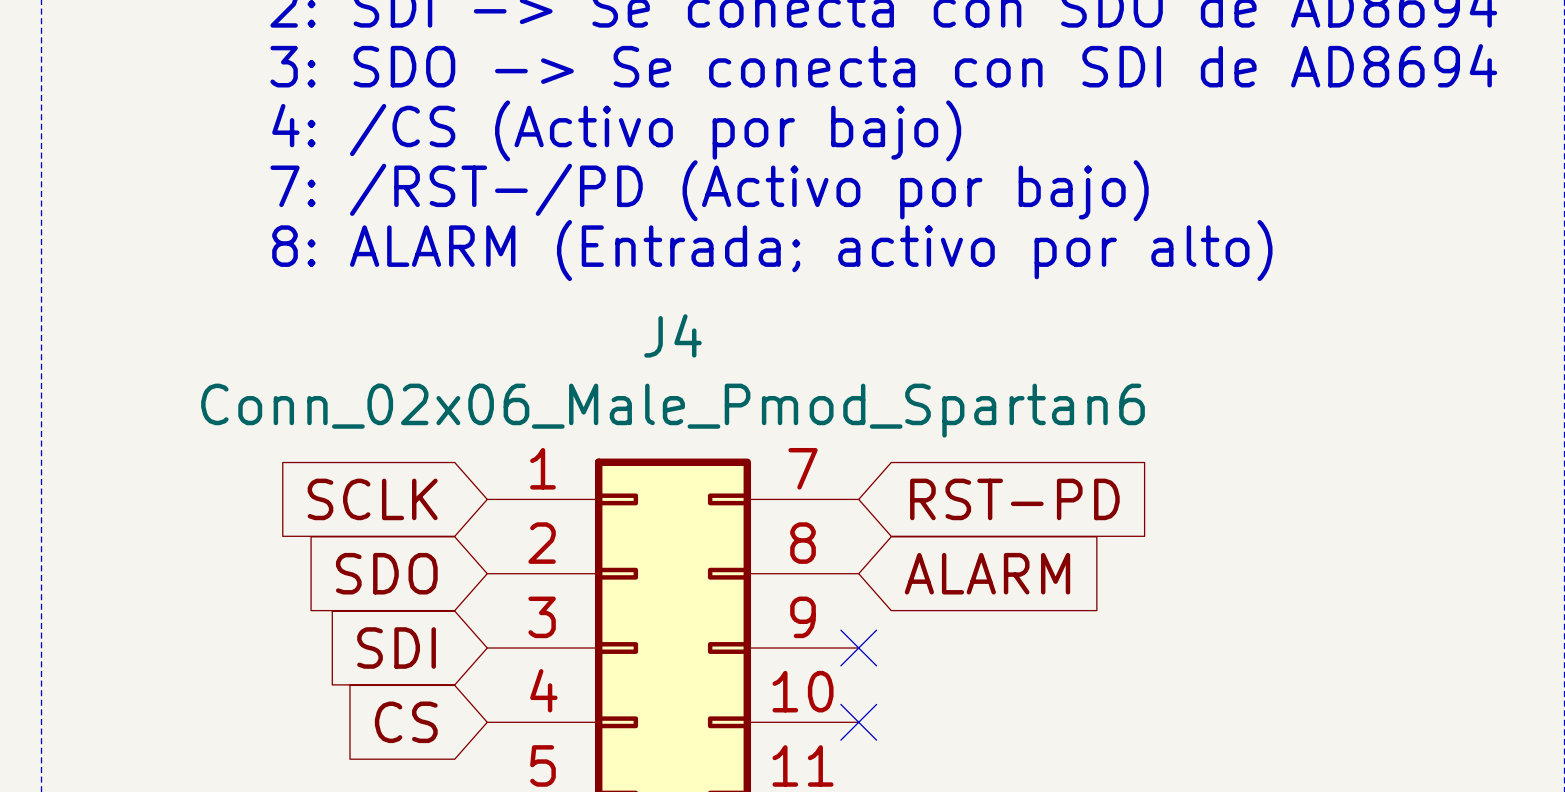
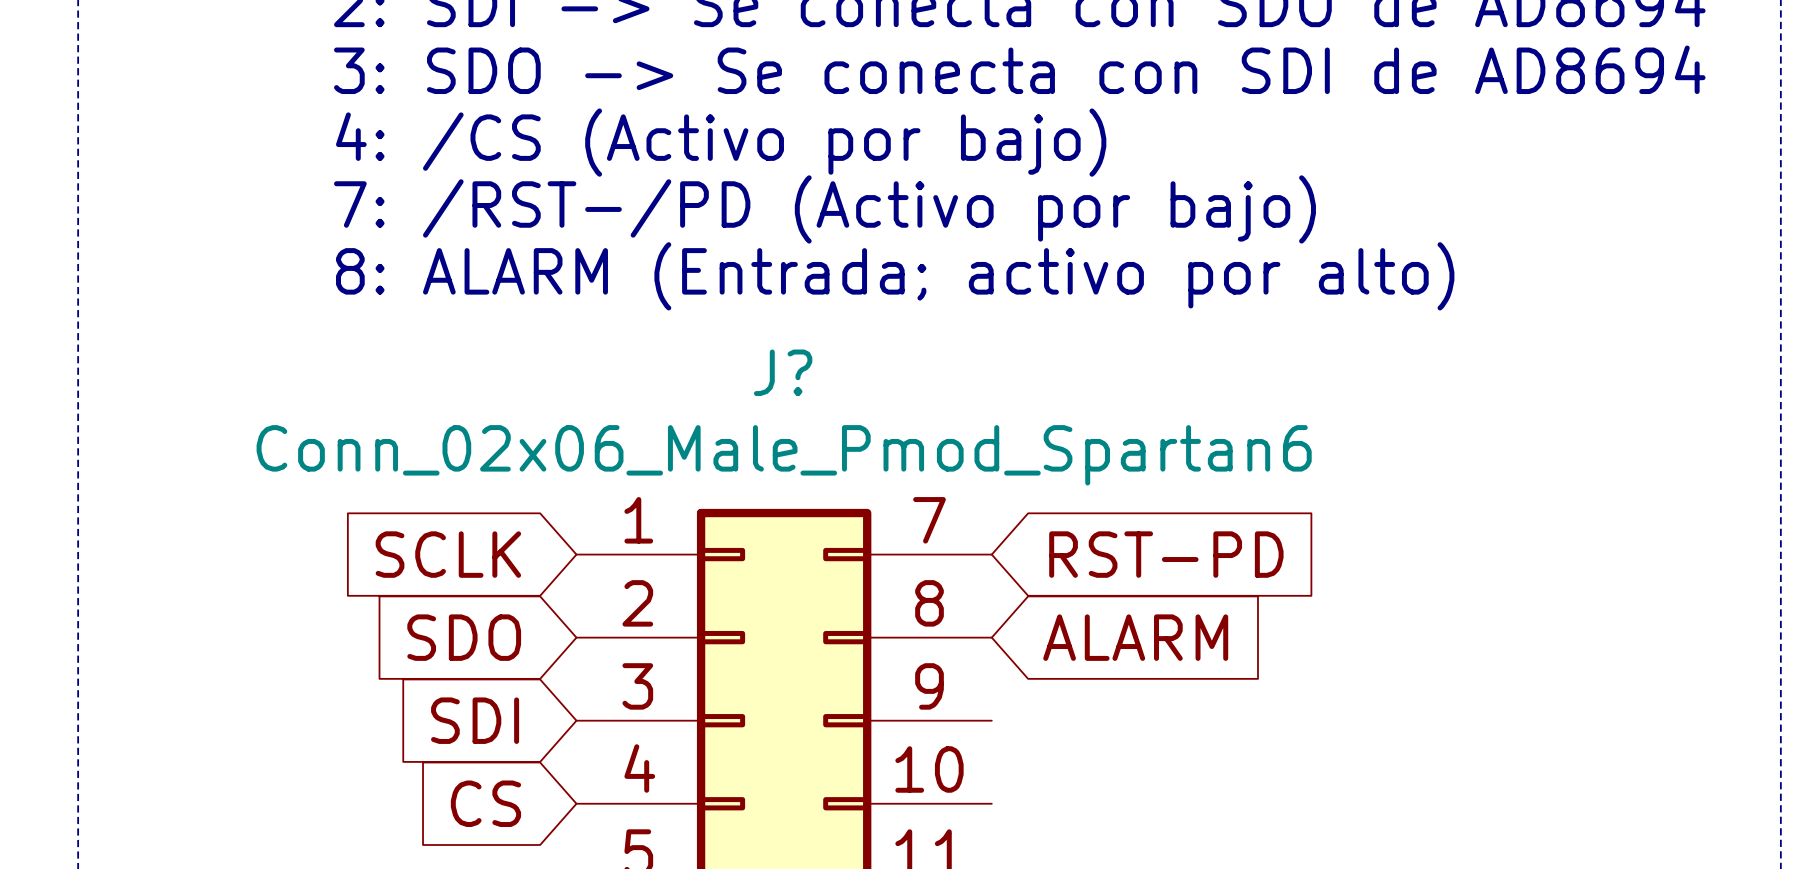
J4 name: J4 (673, 335) -> J? (783, 372)
no-connect mark: (858, 648) -> none
no-connect mark: (858, 722) -> none

